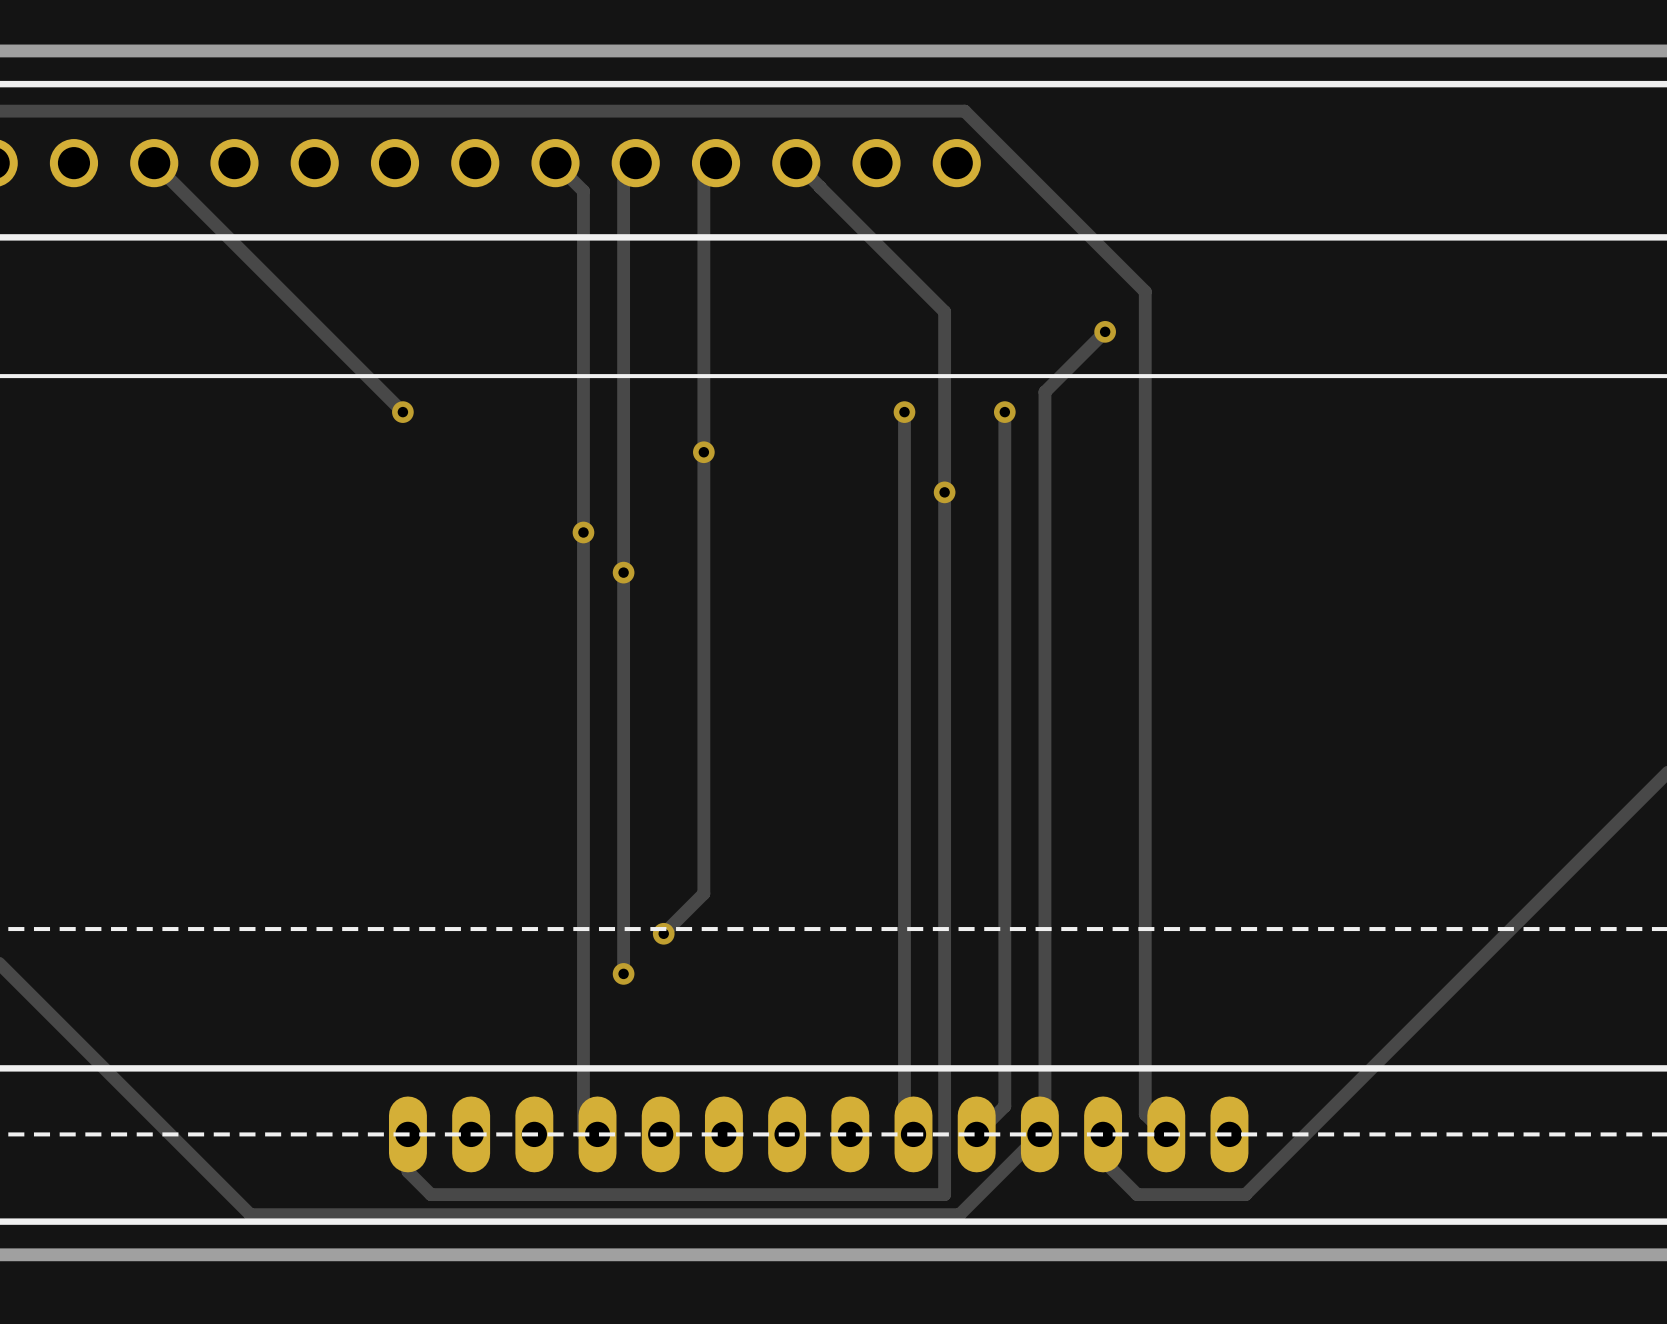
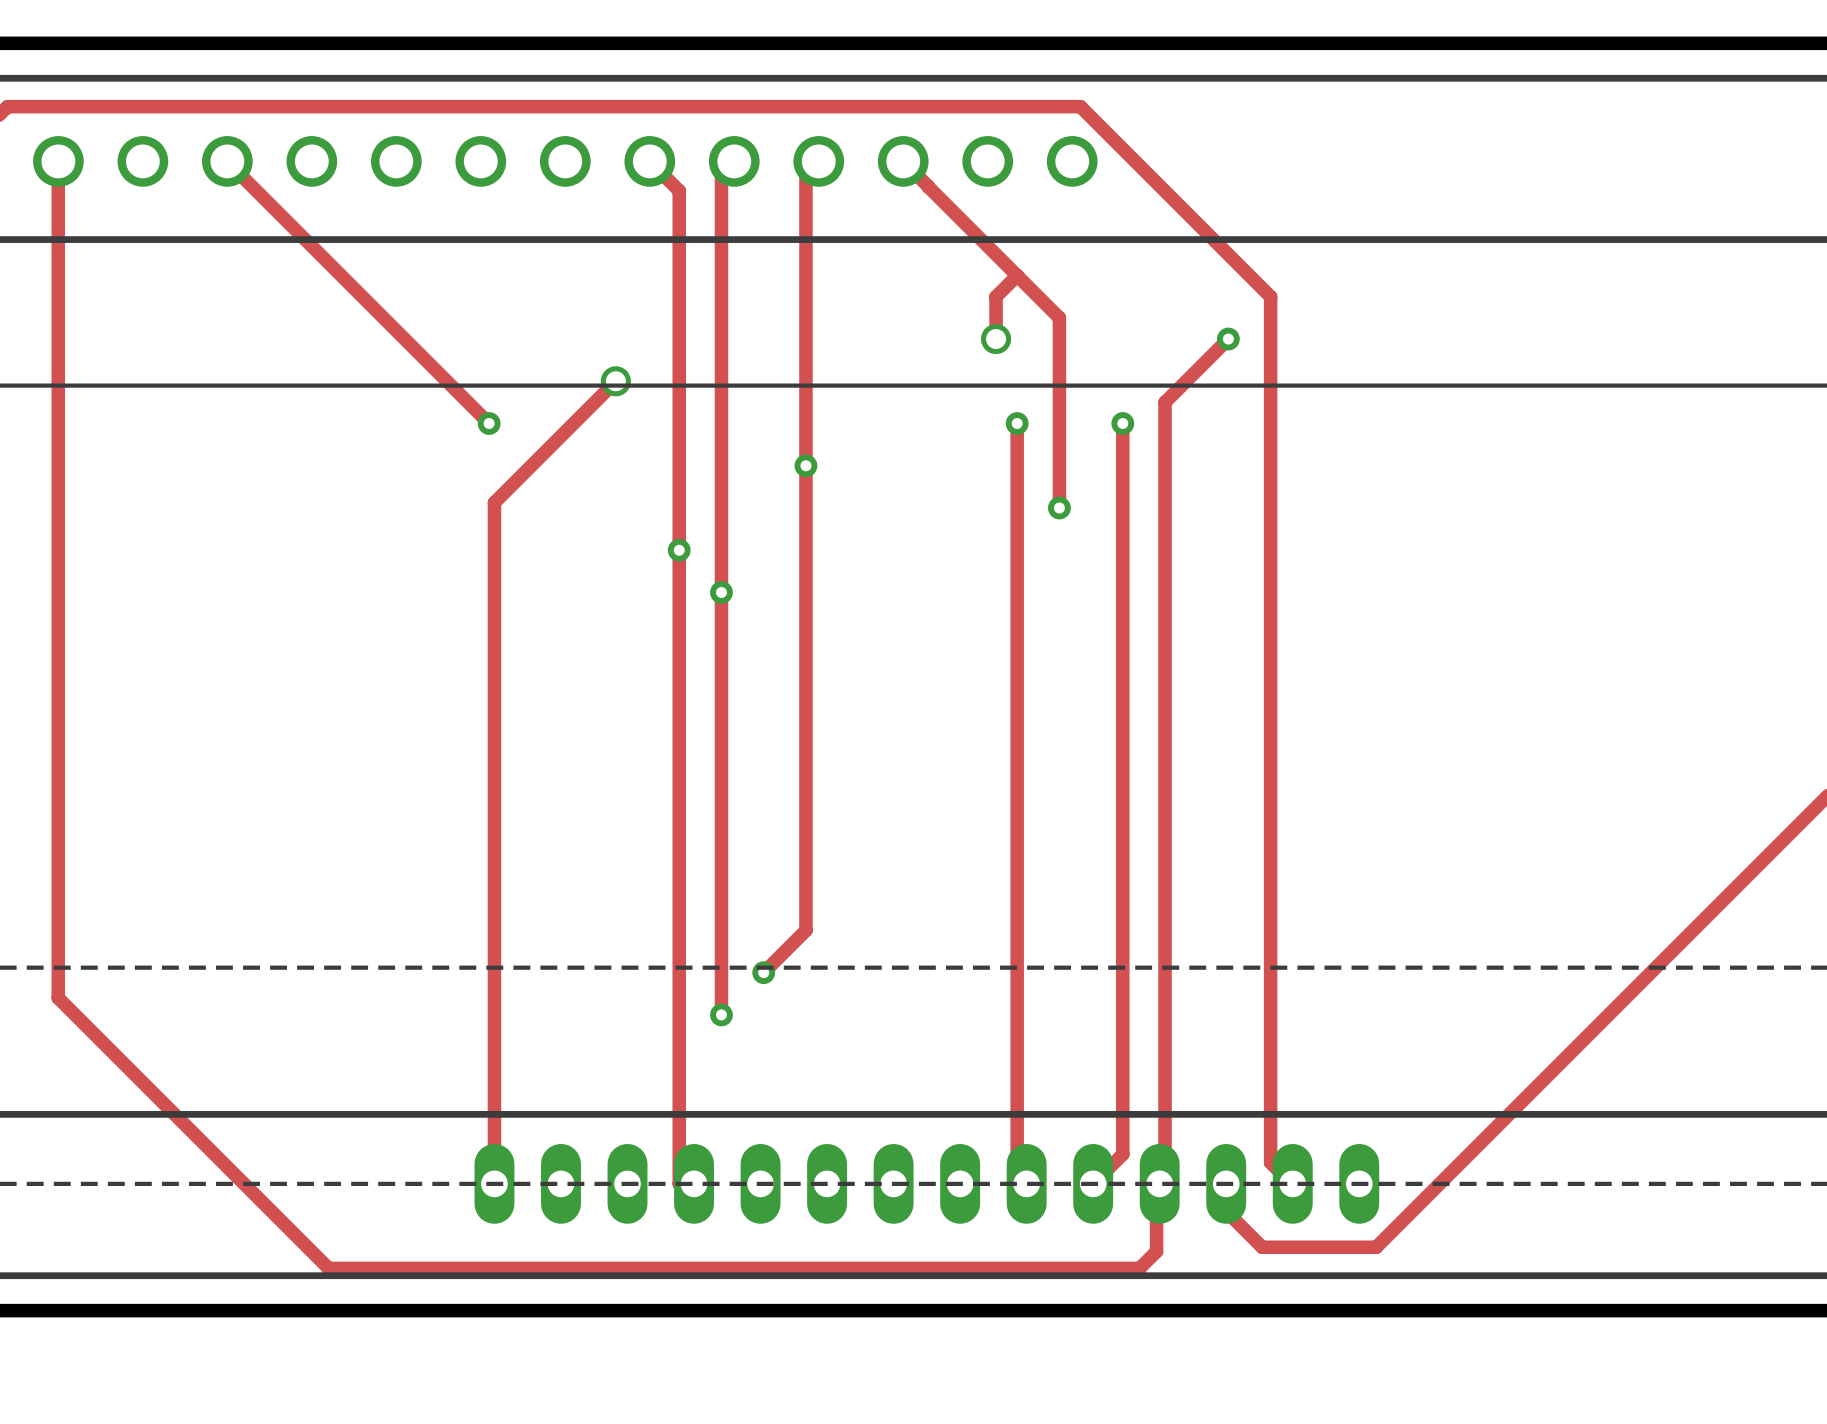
track: none -> (1017, 275) (996, 296) (996, 339)
via: none -> (996, 339)
via: none -> (615, 381)
track: (944, 492) (944, 1194) (430, 1194) (407, 1171) (407, 1134) -> (615, 381) (494, 502) (494, 1183)
track: (1036, 1137) (959, 1214) -> (1156, 1187) (1156, 1251) (1139, 1268) (1075, 1268)

